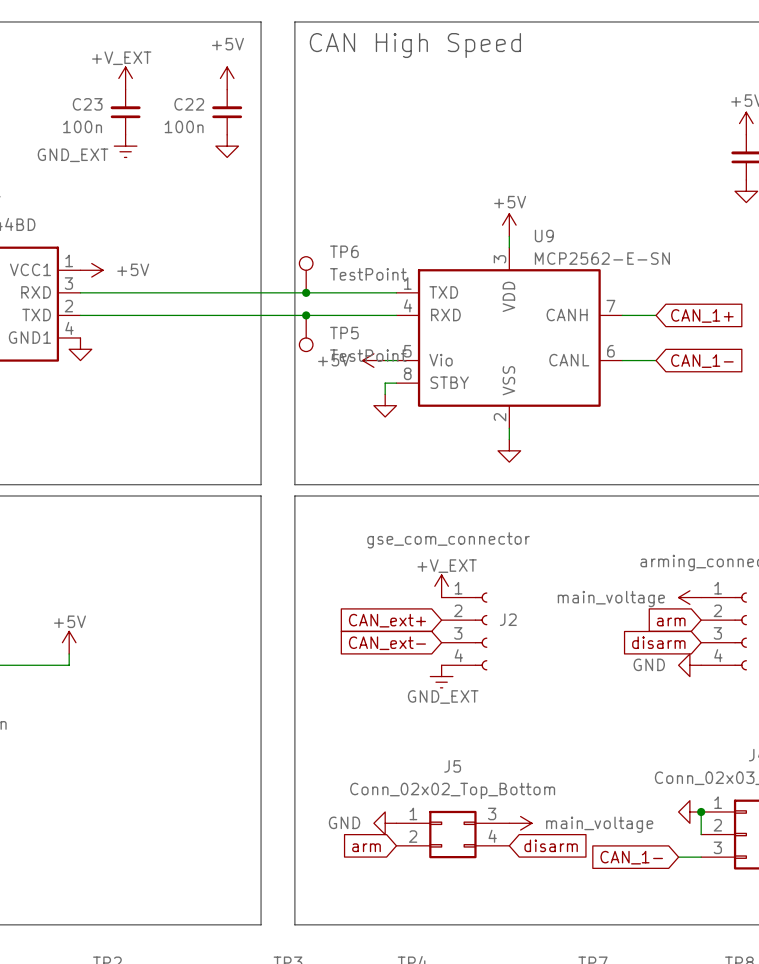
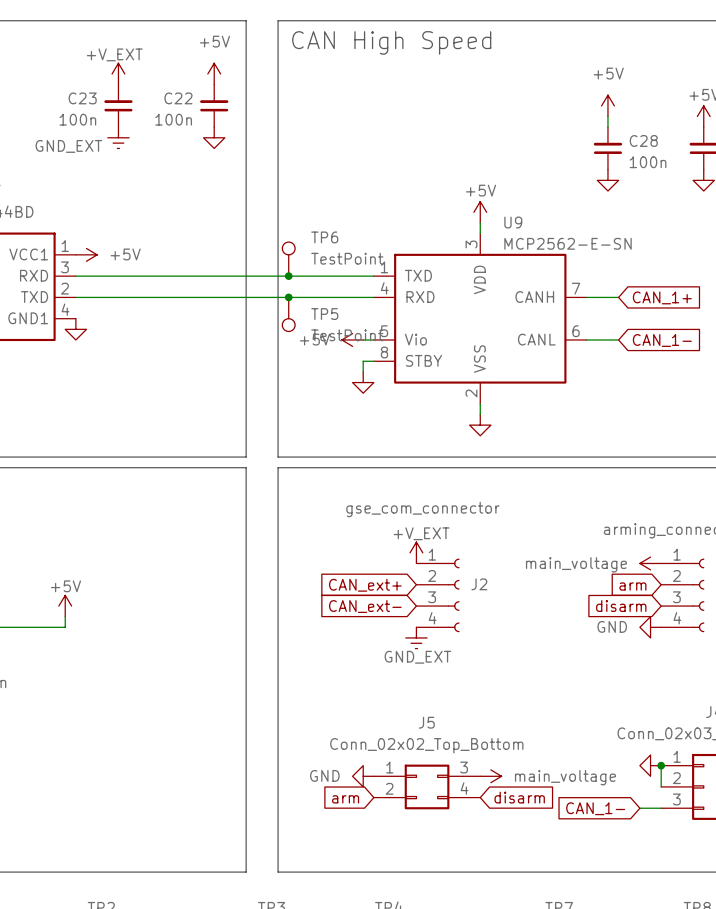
power symbol: none -> +5V (607, 105)
wire: none -> (607, 116) (607, 127)
C28: none -> 100n (607, 148)
power symbol: none -> (607, 180)

